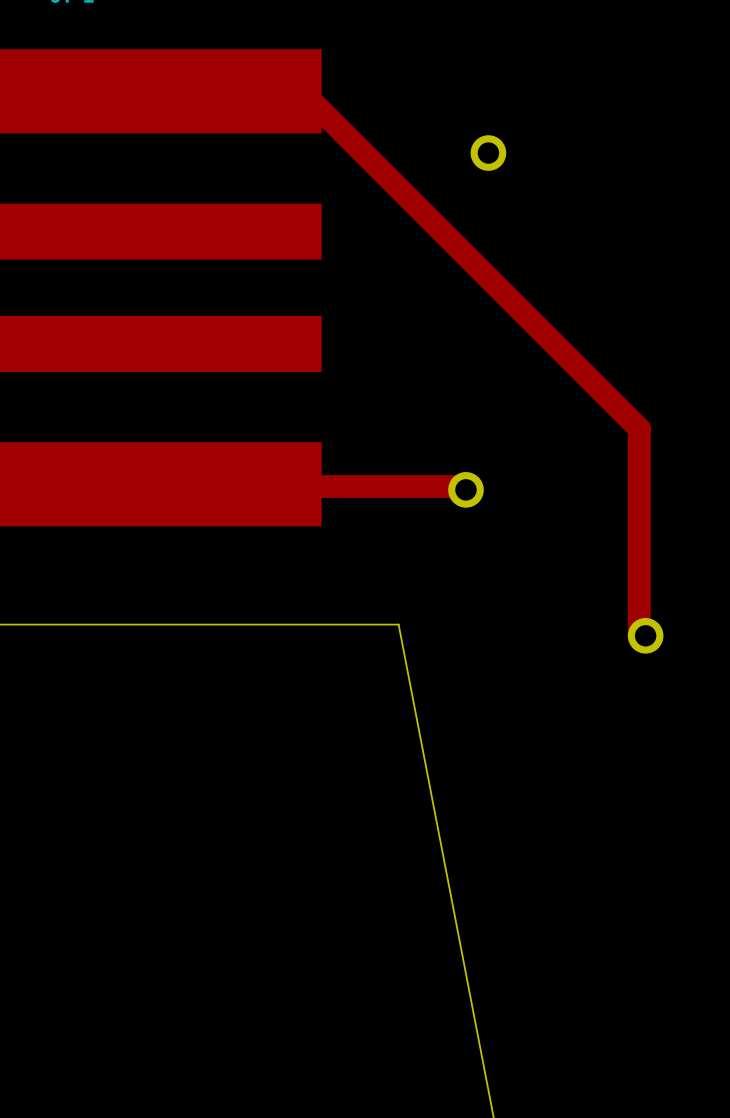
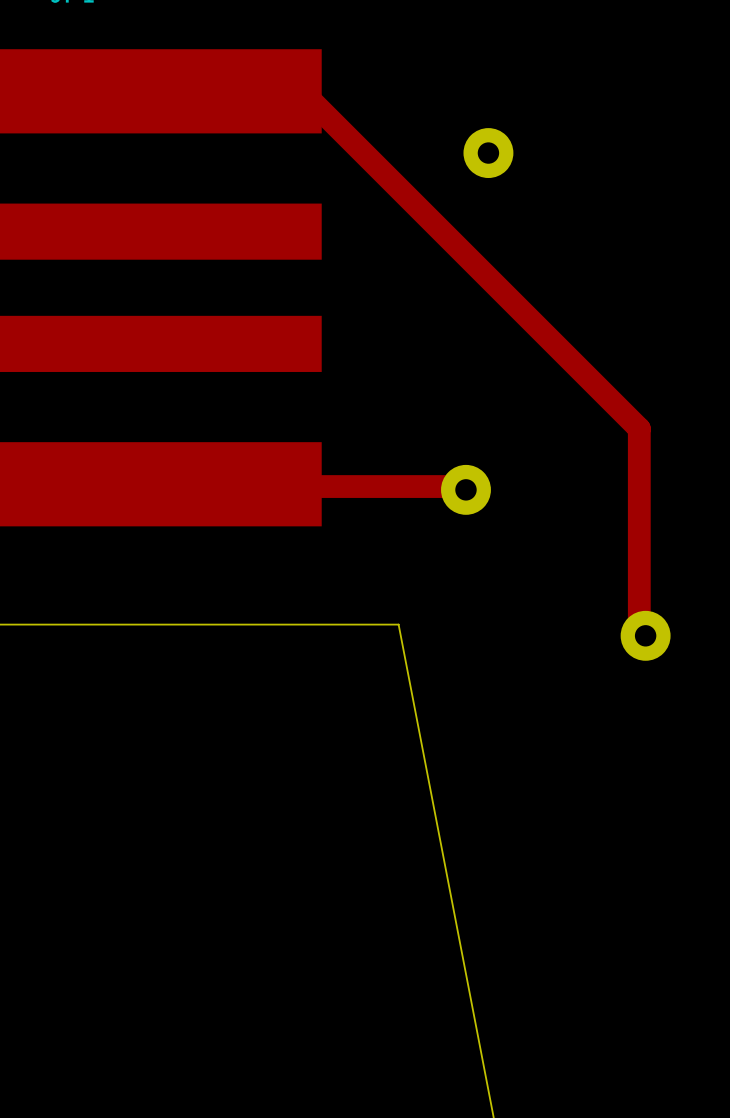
part footprint: [470, 135, 507, 171] -> [463, 128, 514, 179]
part footprint: [448, 472, 484, 508] -> [441, 464, 491, 515]
part footprint: [627, 617, 664, 654] -> [620, 610, 671, 661]

